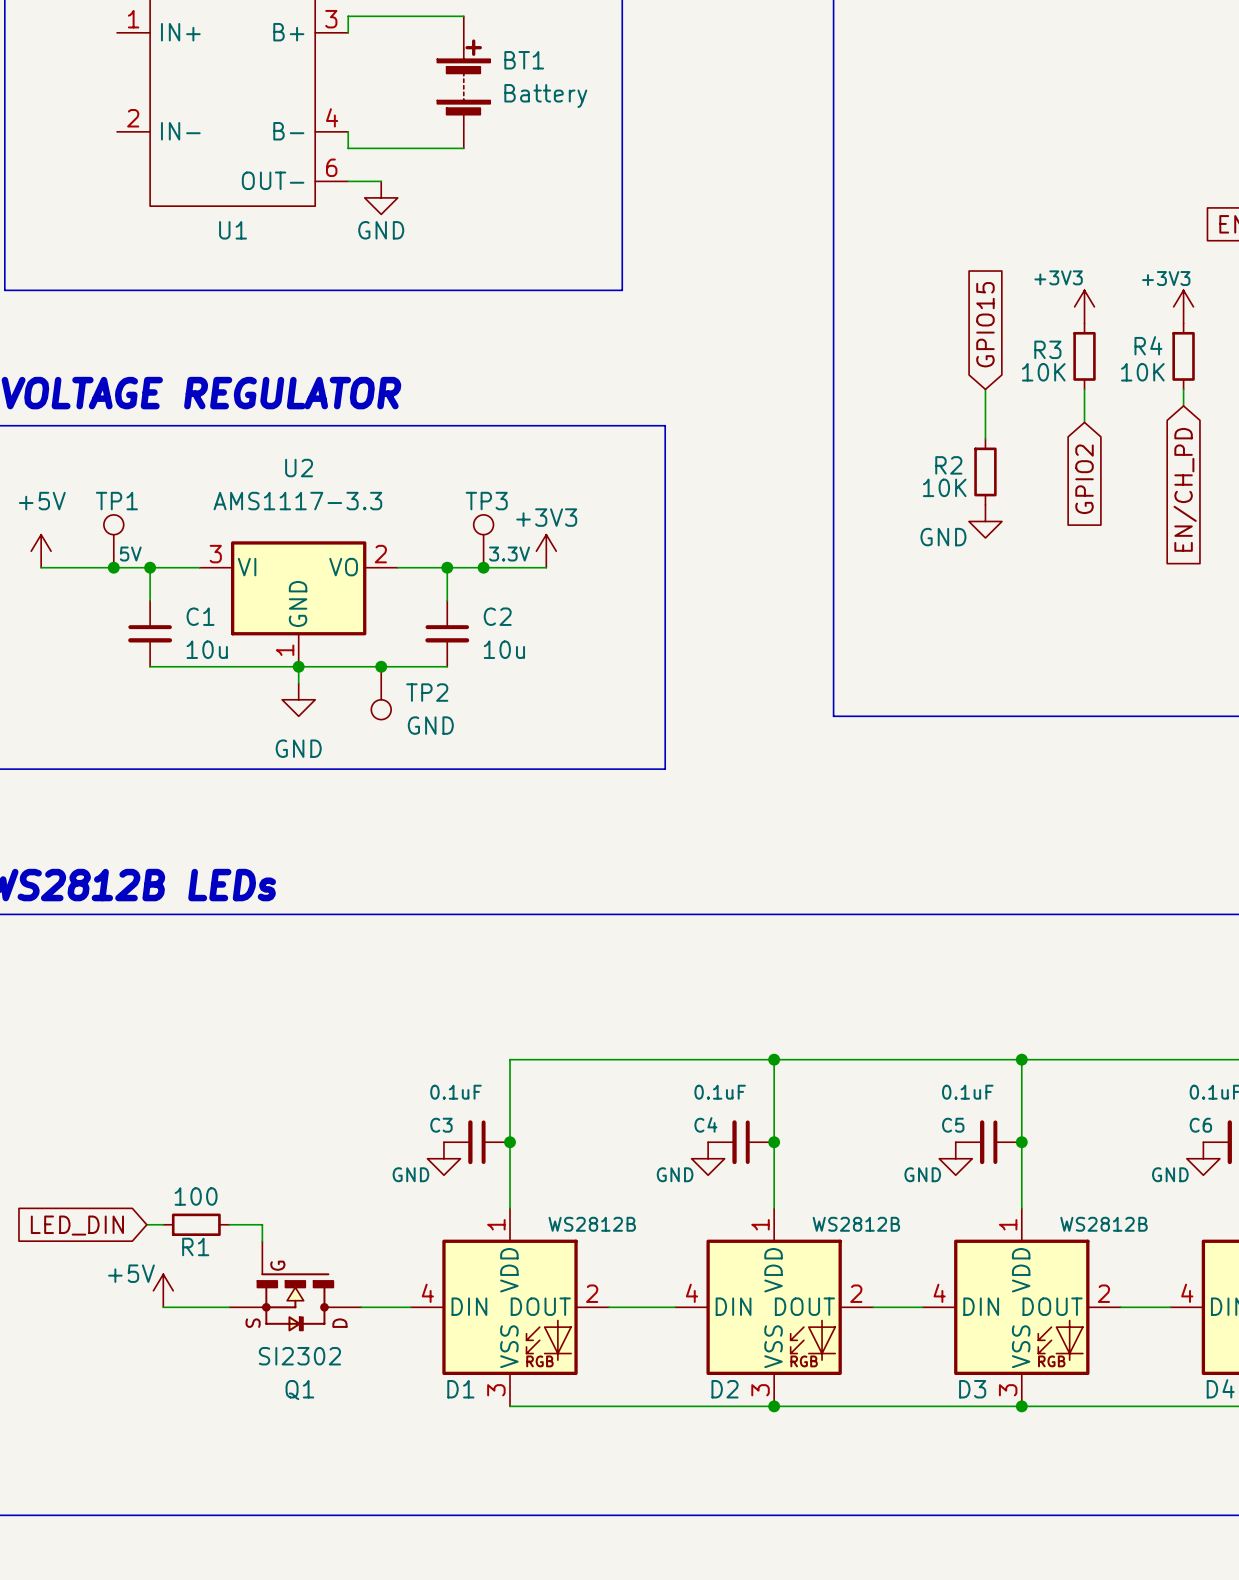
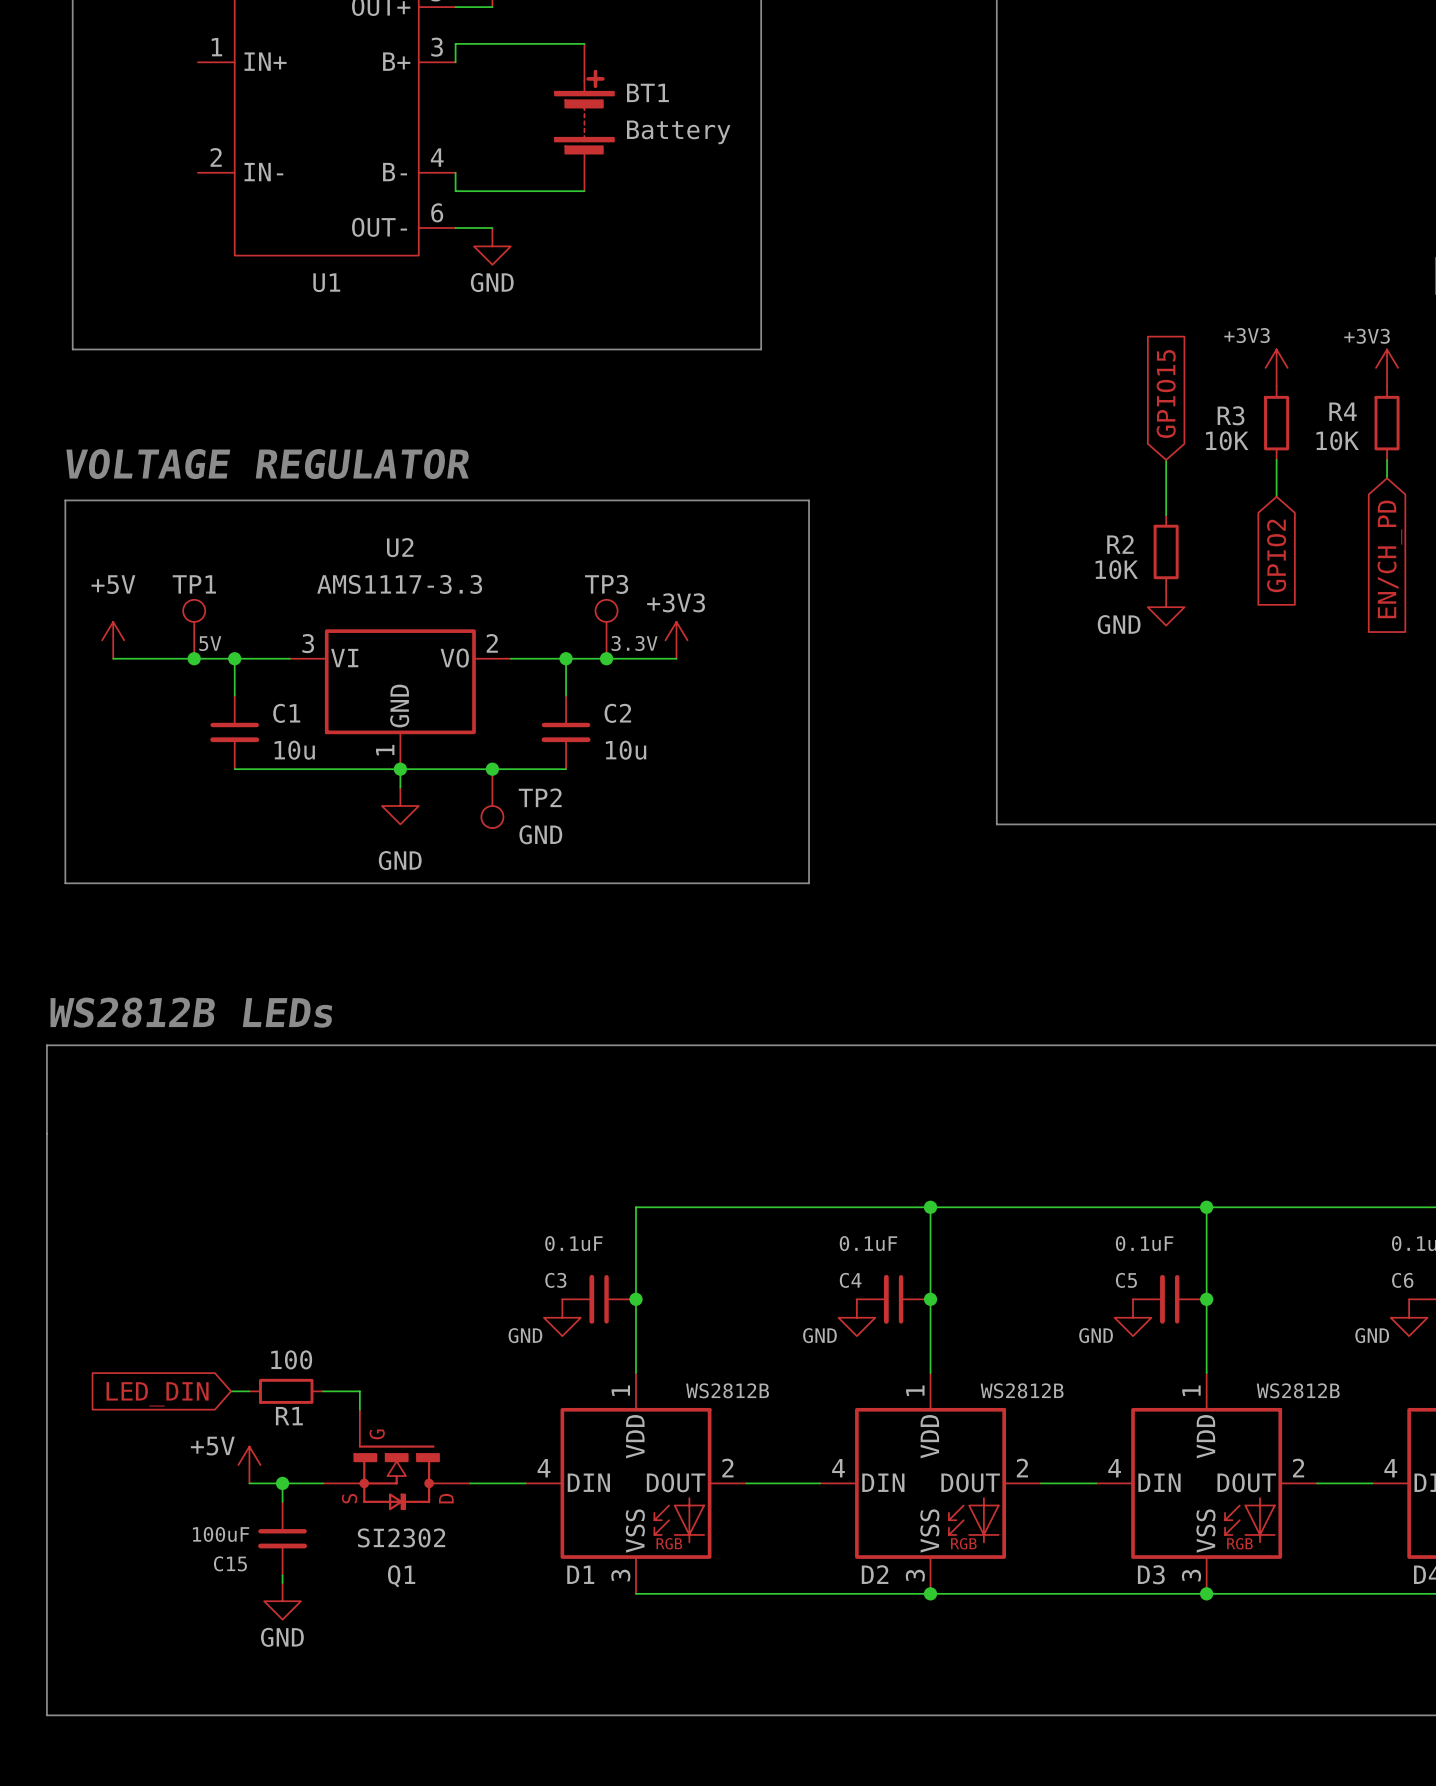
wire: none -> (282, 1483) (282, 1501)
junction: none -> (282, 1483)
C15: none -> 100uF (282, 1538)
wire: none -> (282, 1575) (282, 1582)
power symbol: none -> GND (282, 1601)

